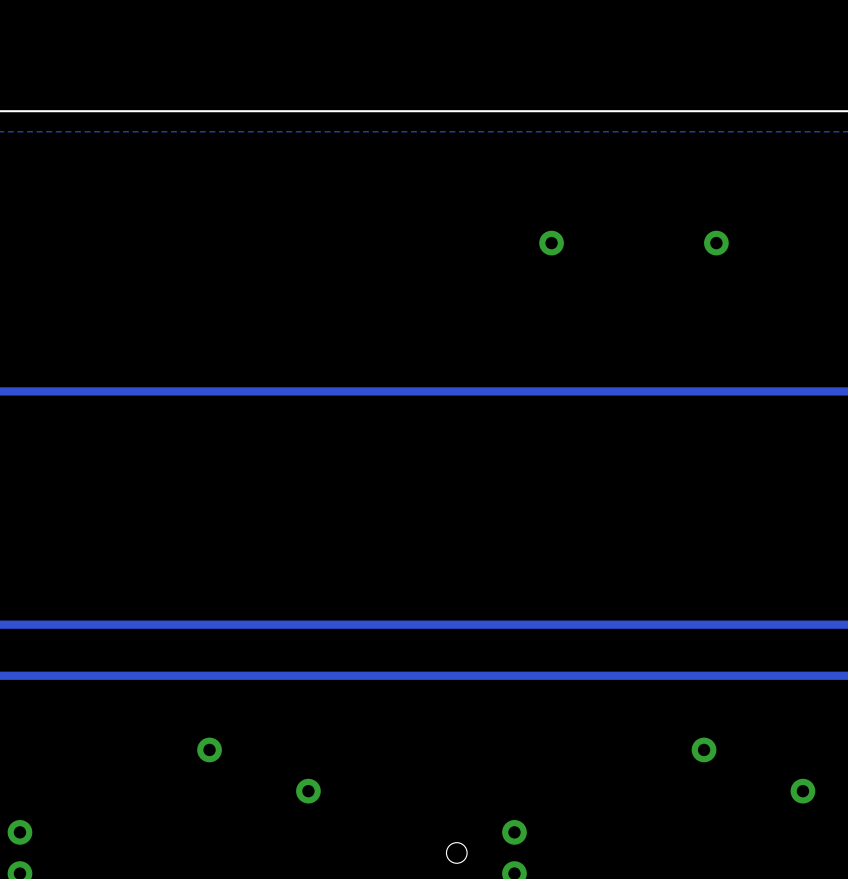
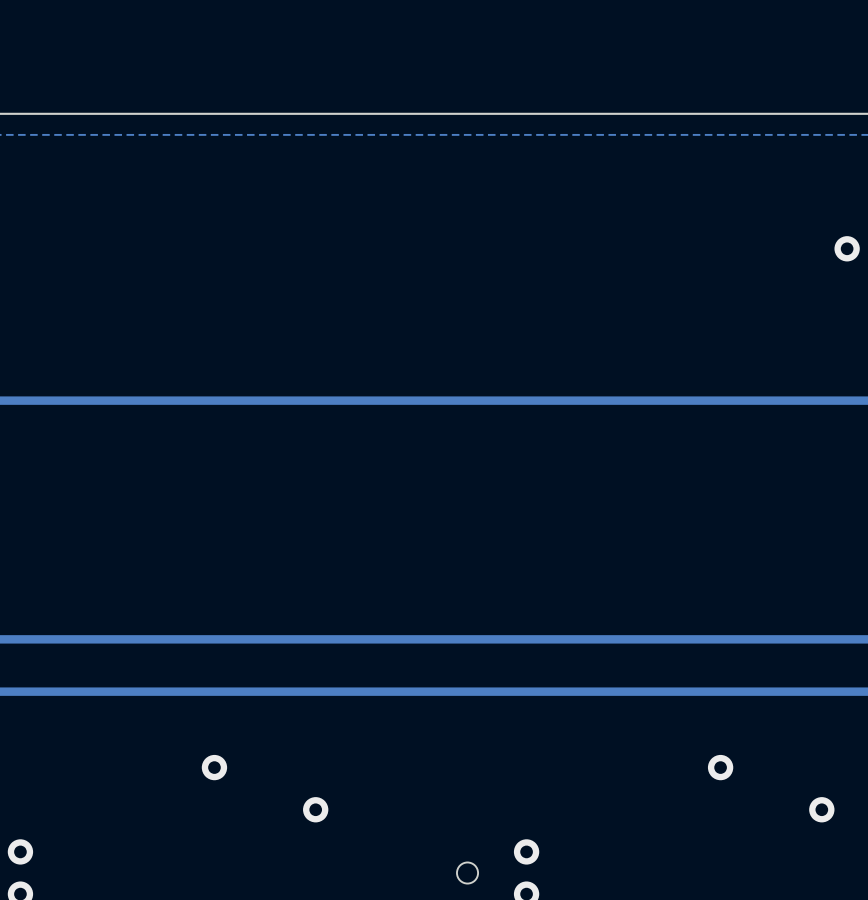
via: (551, 243) -> none
via position: (716, 243) -> (847, 248)

